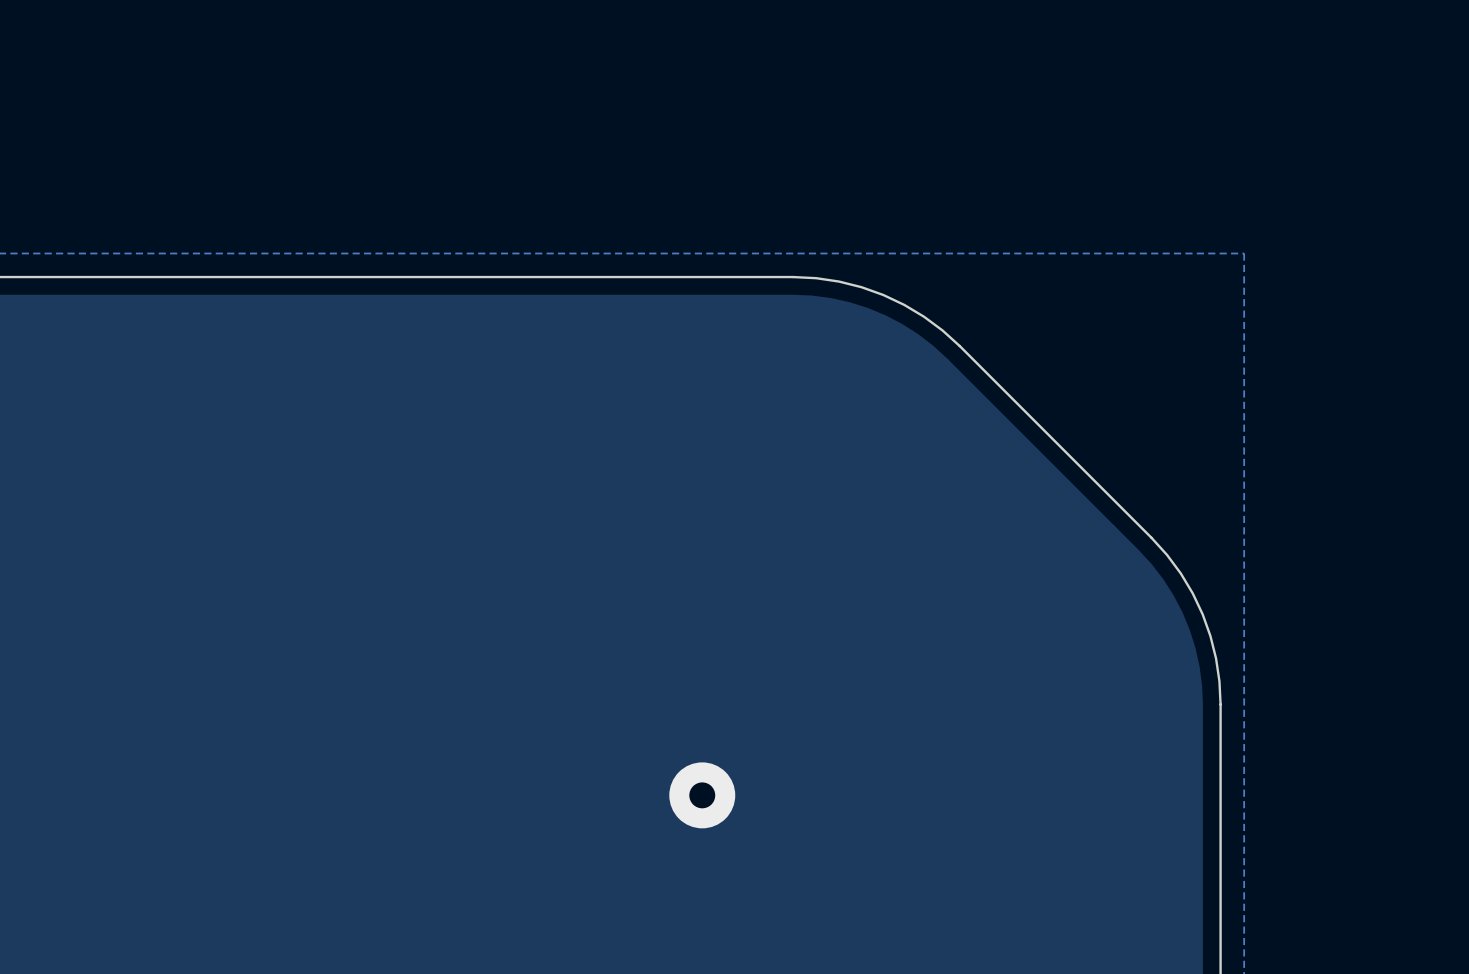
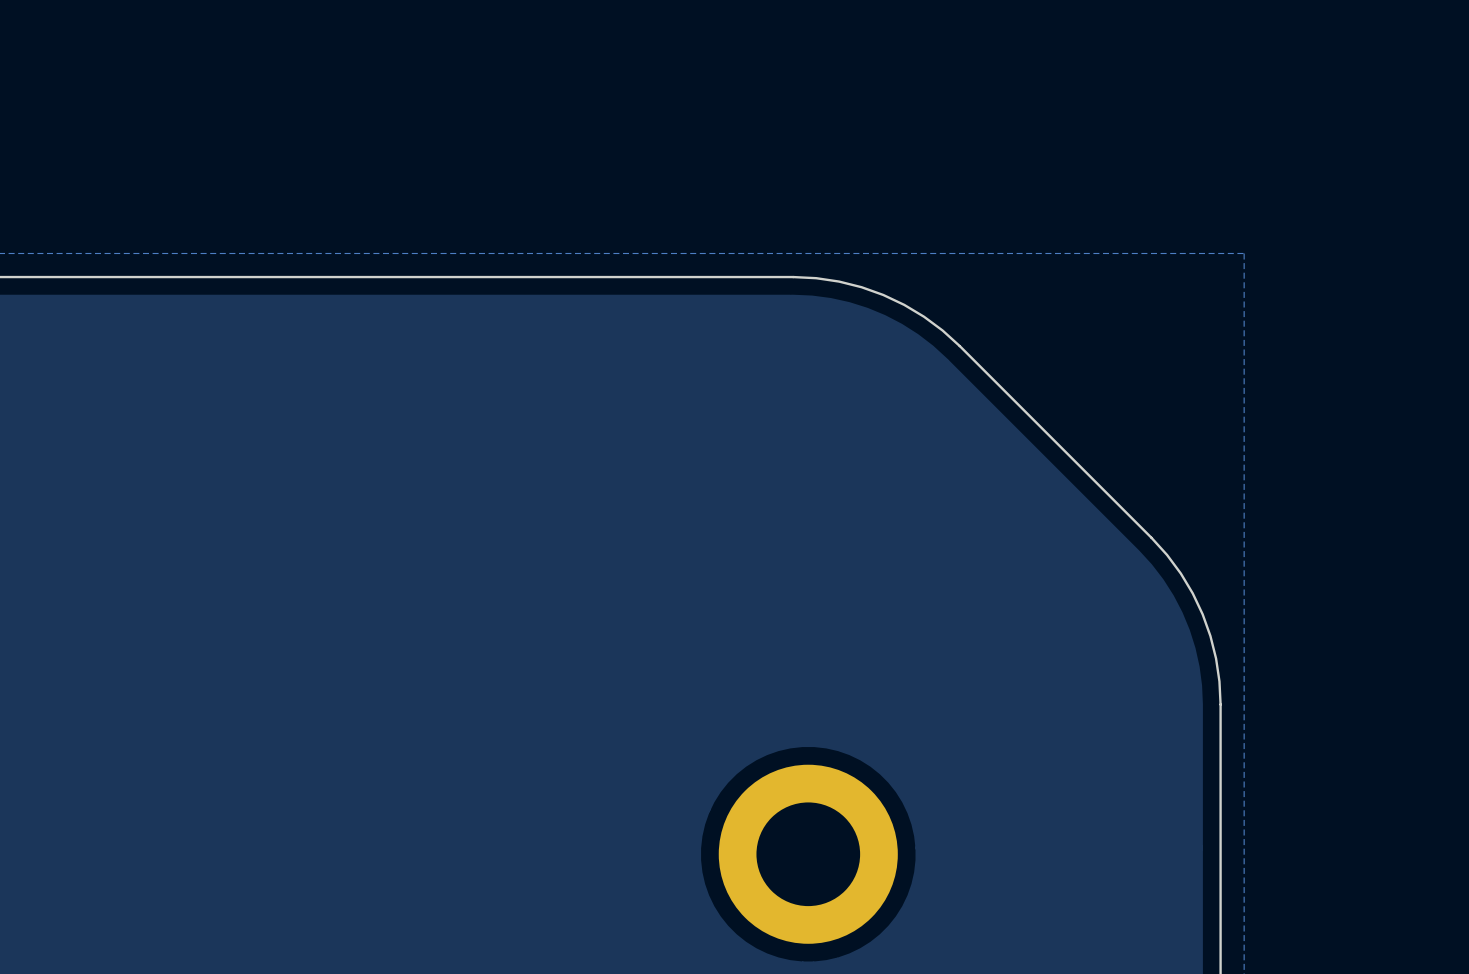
via: (702, 795) -> none
part: none -> (808, 854)

